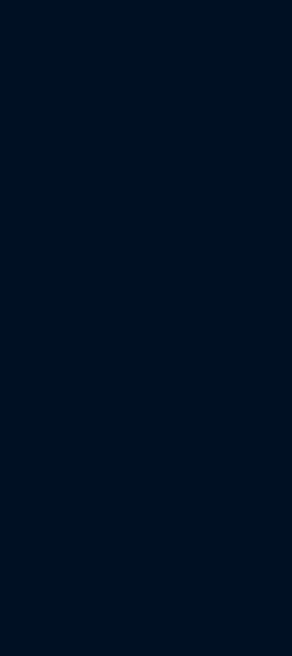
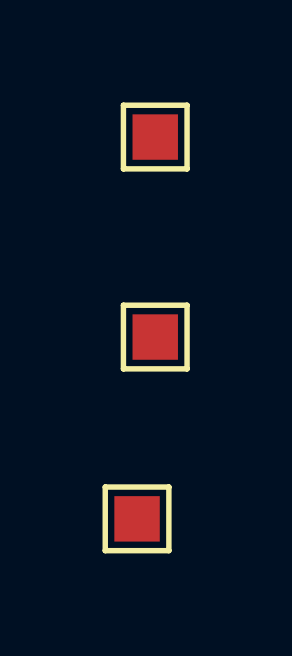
part: none -> (155, 137)
part: none -> (155, 337)
part: none -> (137, 518)

